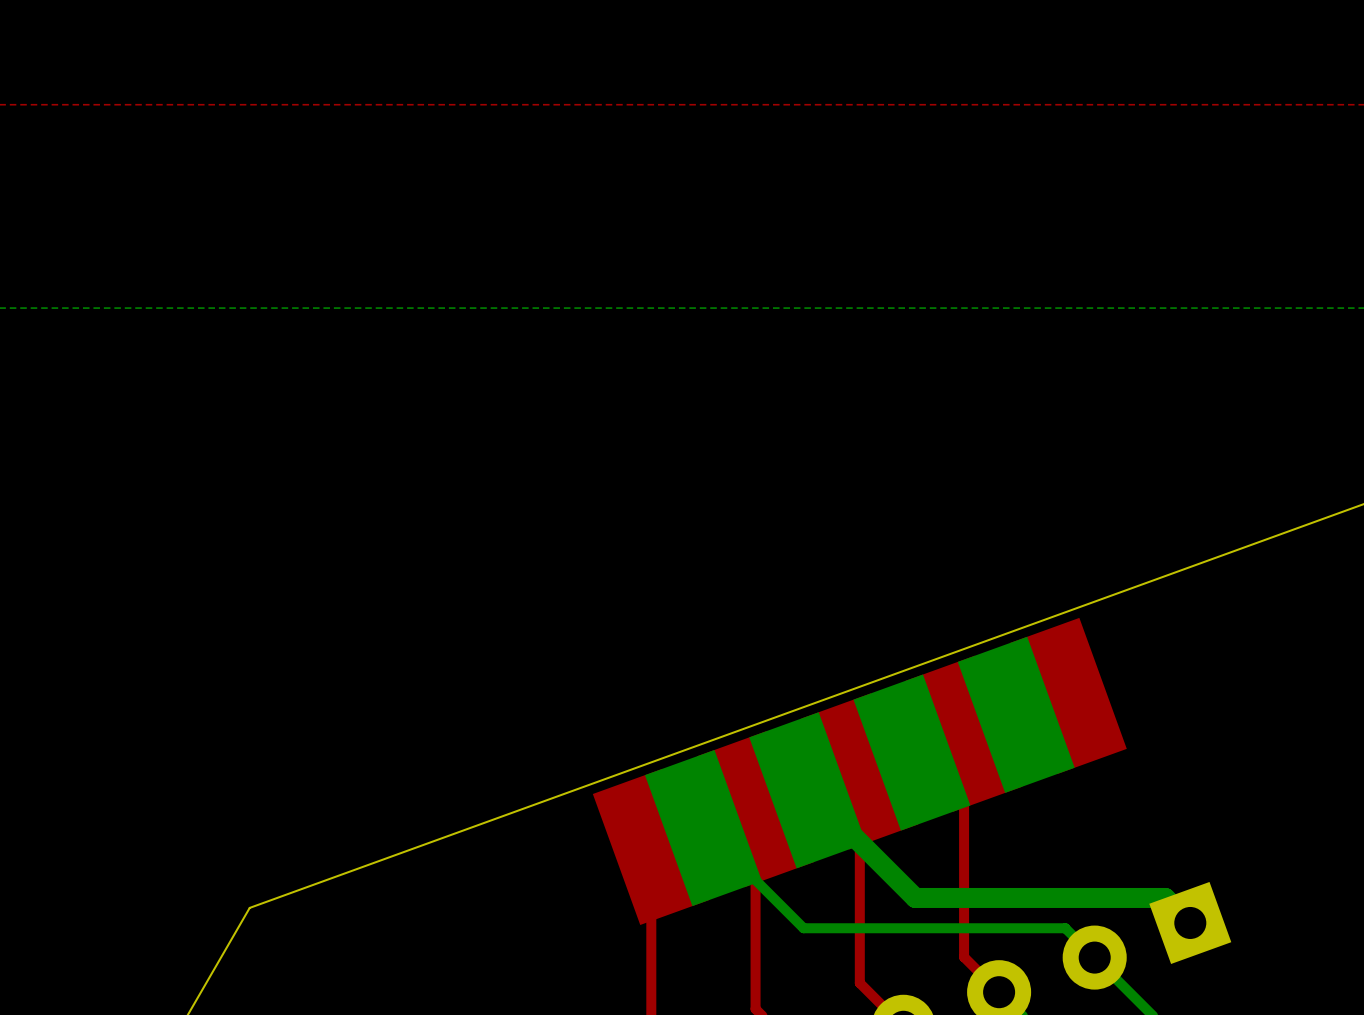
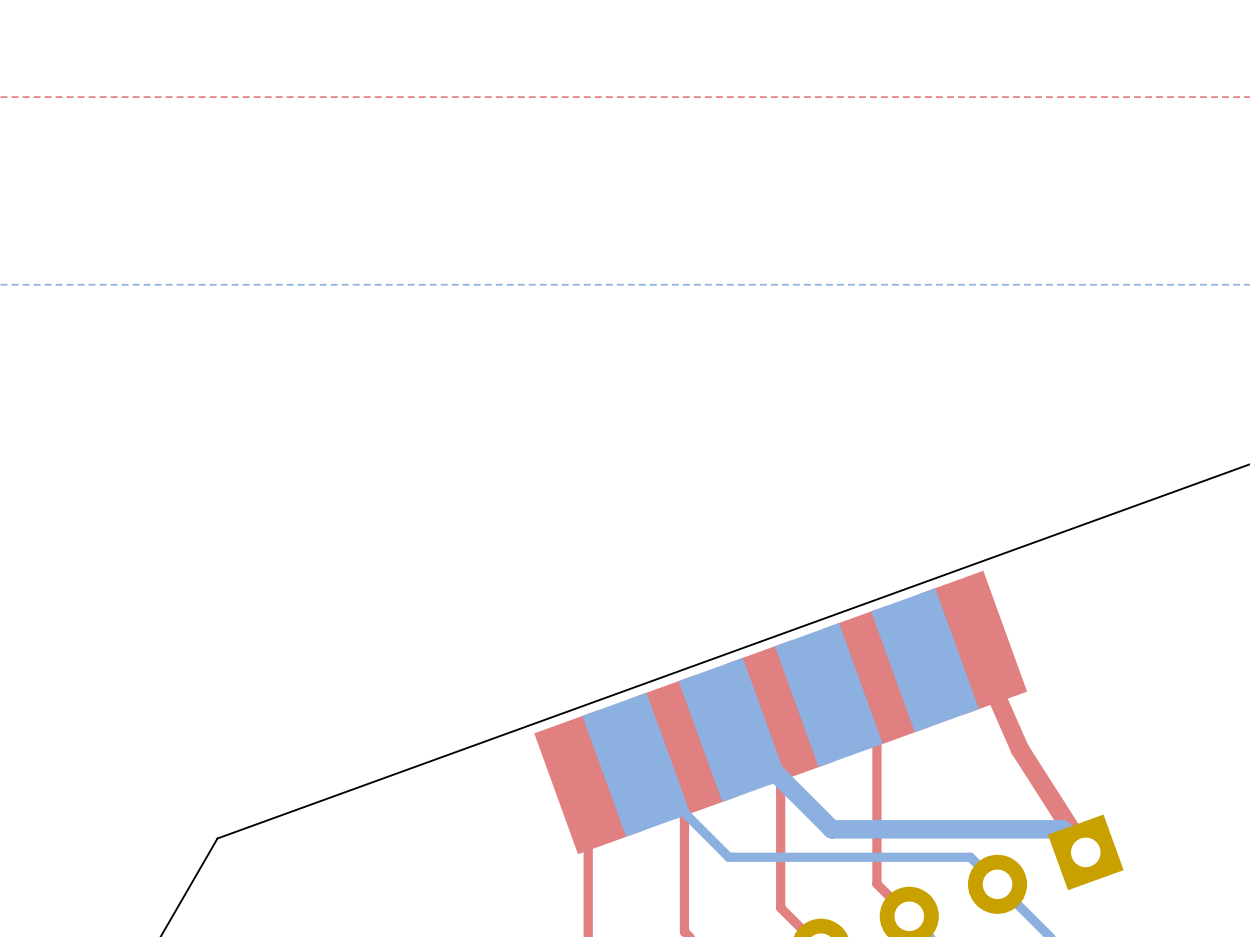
top track: none -> (973, 642) (1019, 749) (1085, 852)

